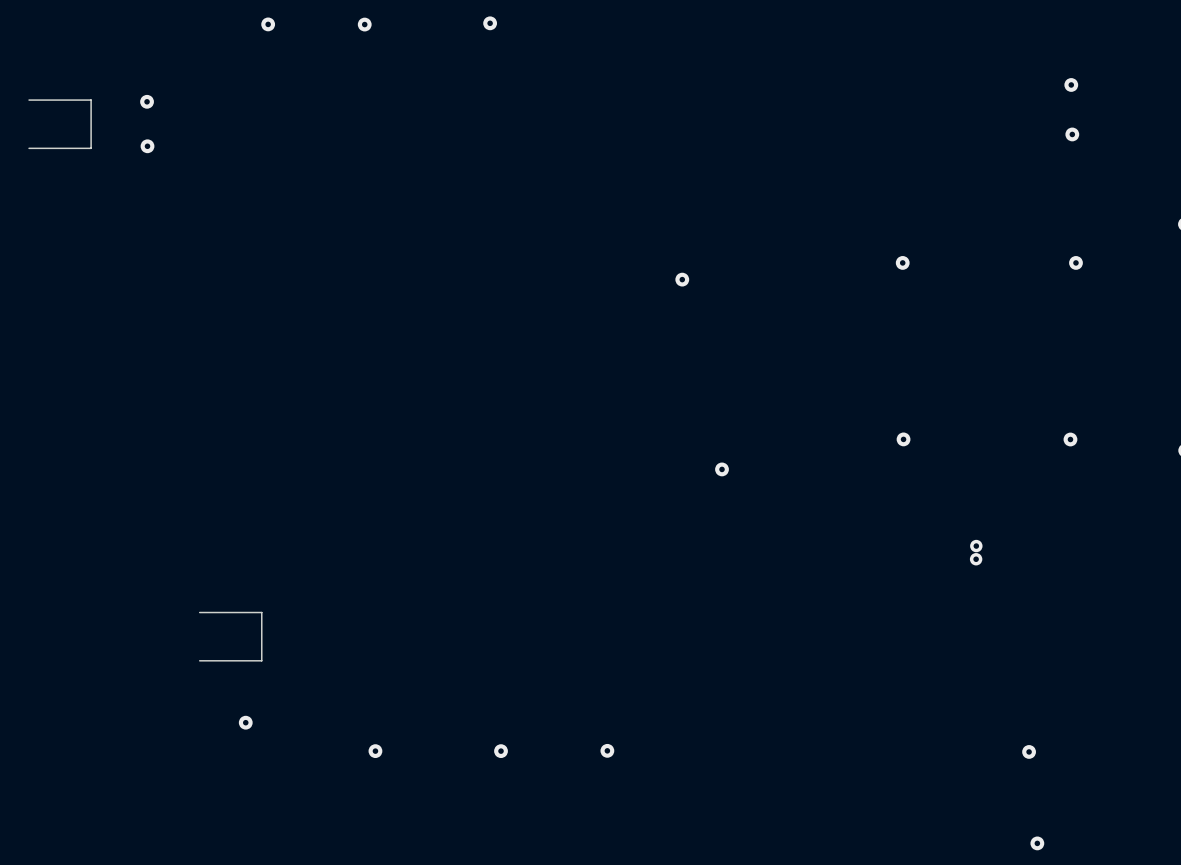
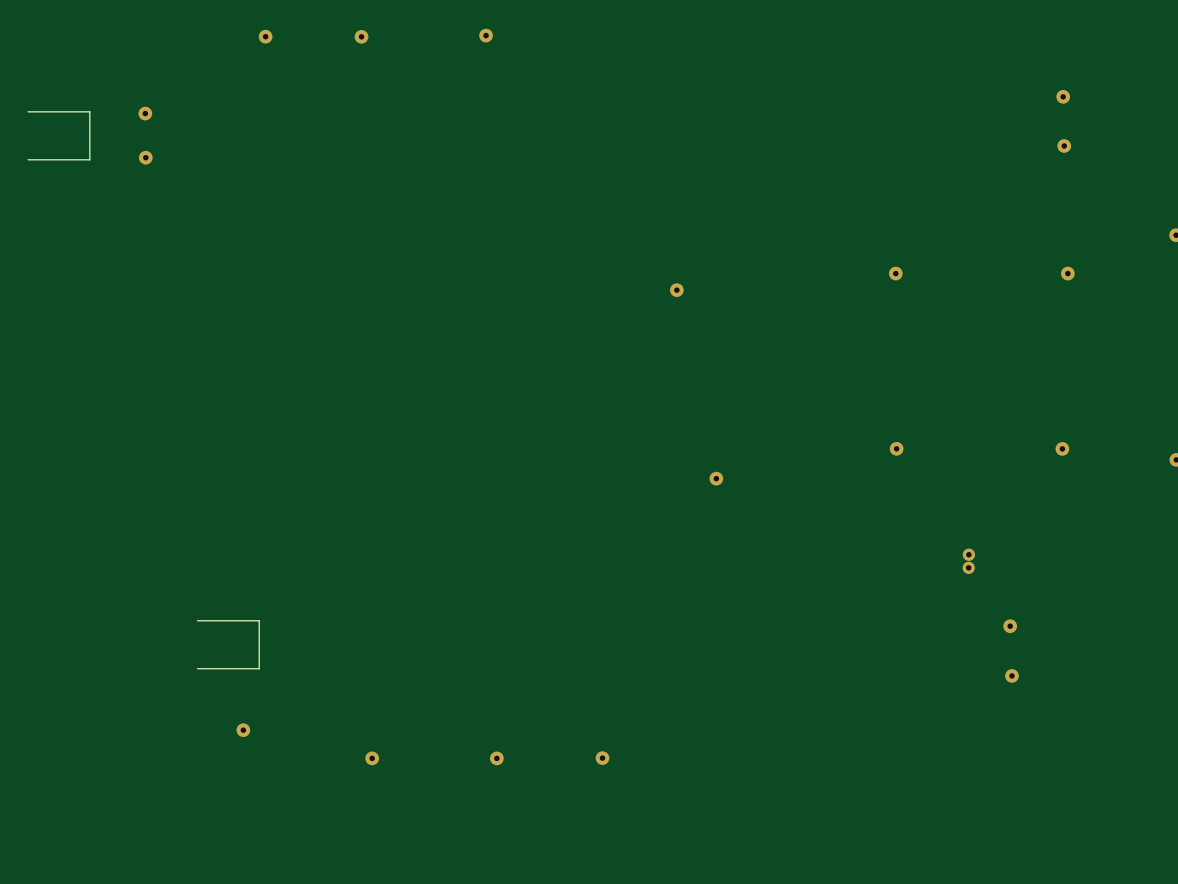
via: none -> (1010, 626)
via: none -> (1011, 675)
via: (1029, 751) -> none
via: (1037, 843) -> none

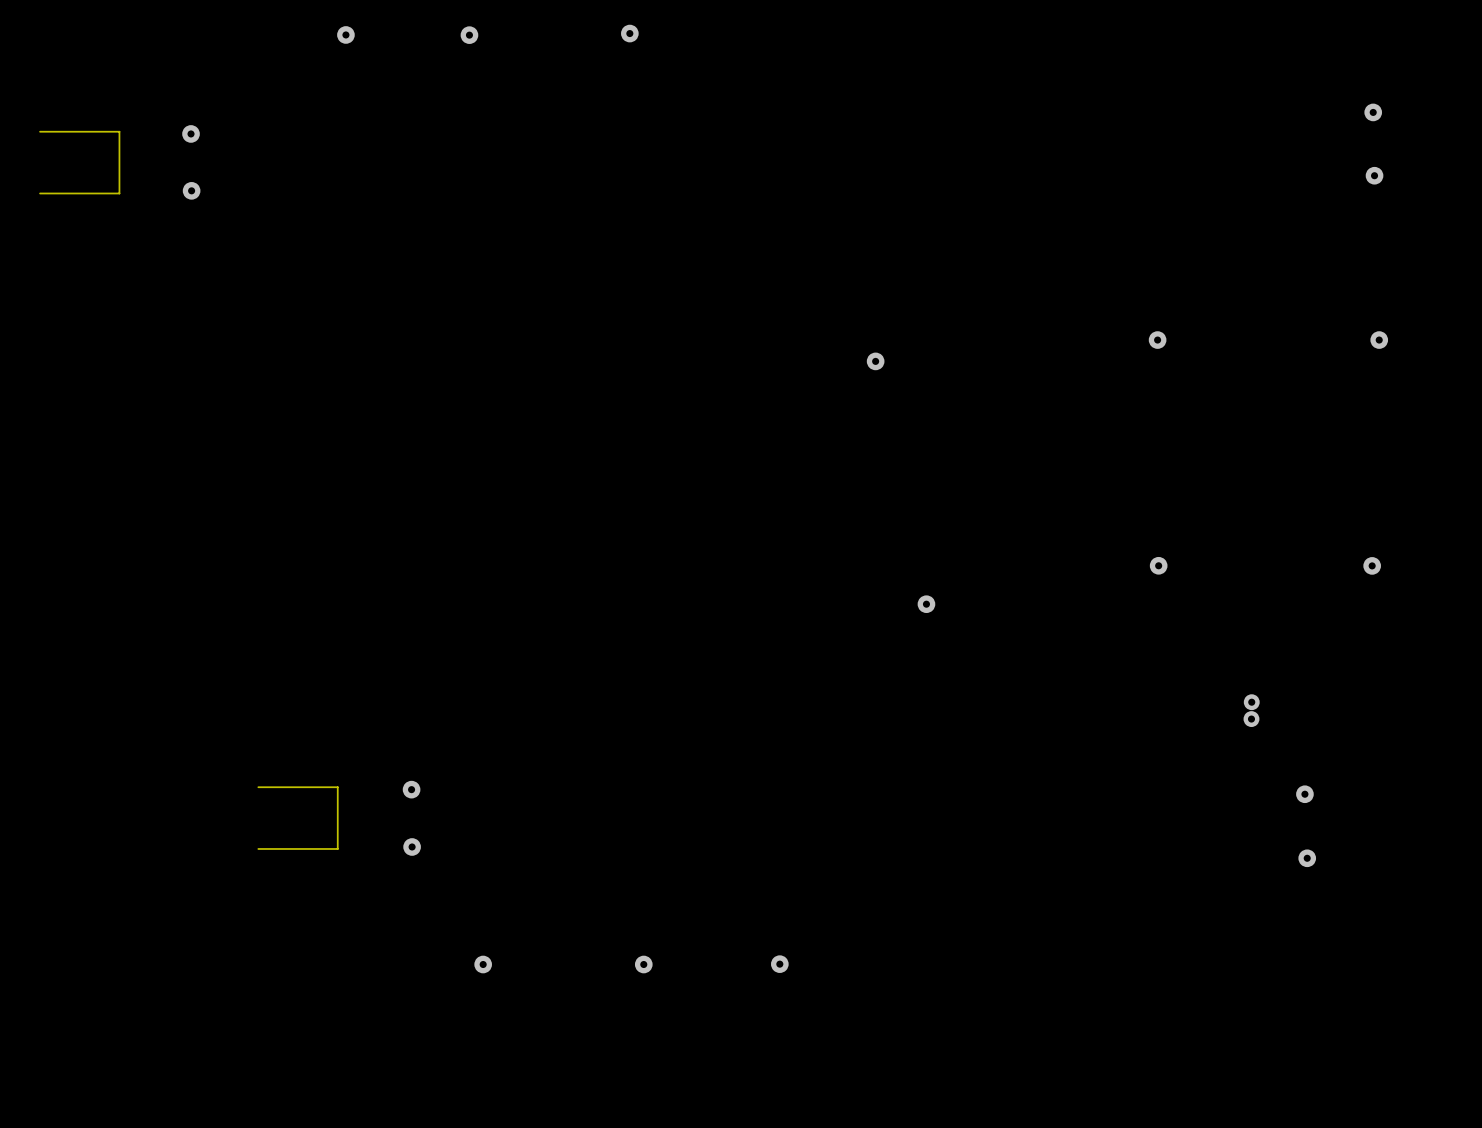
via: none -> (411, 789)
via: none -> (412, 846)
via: (243, 730) -> none

